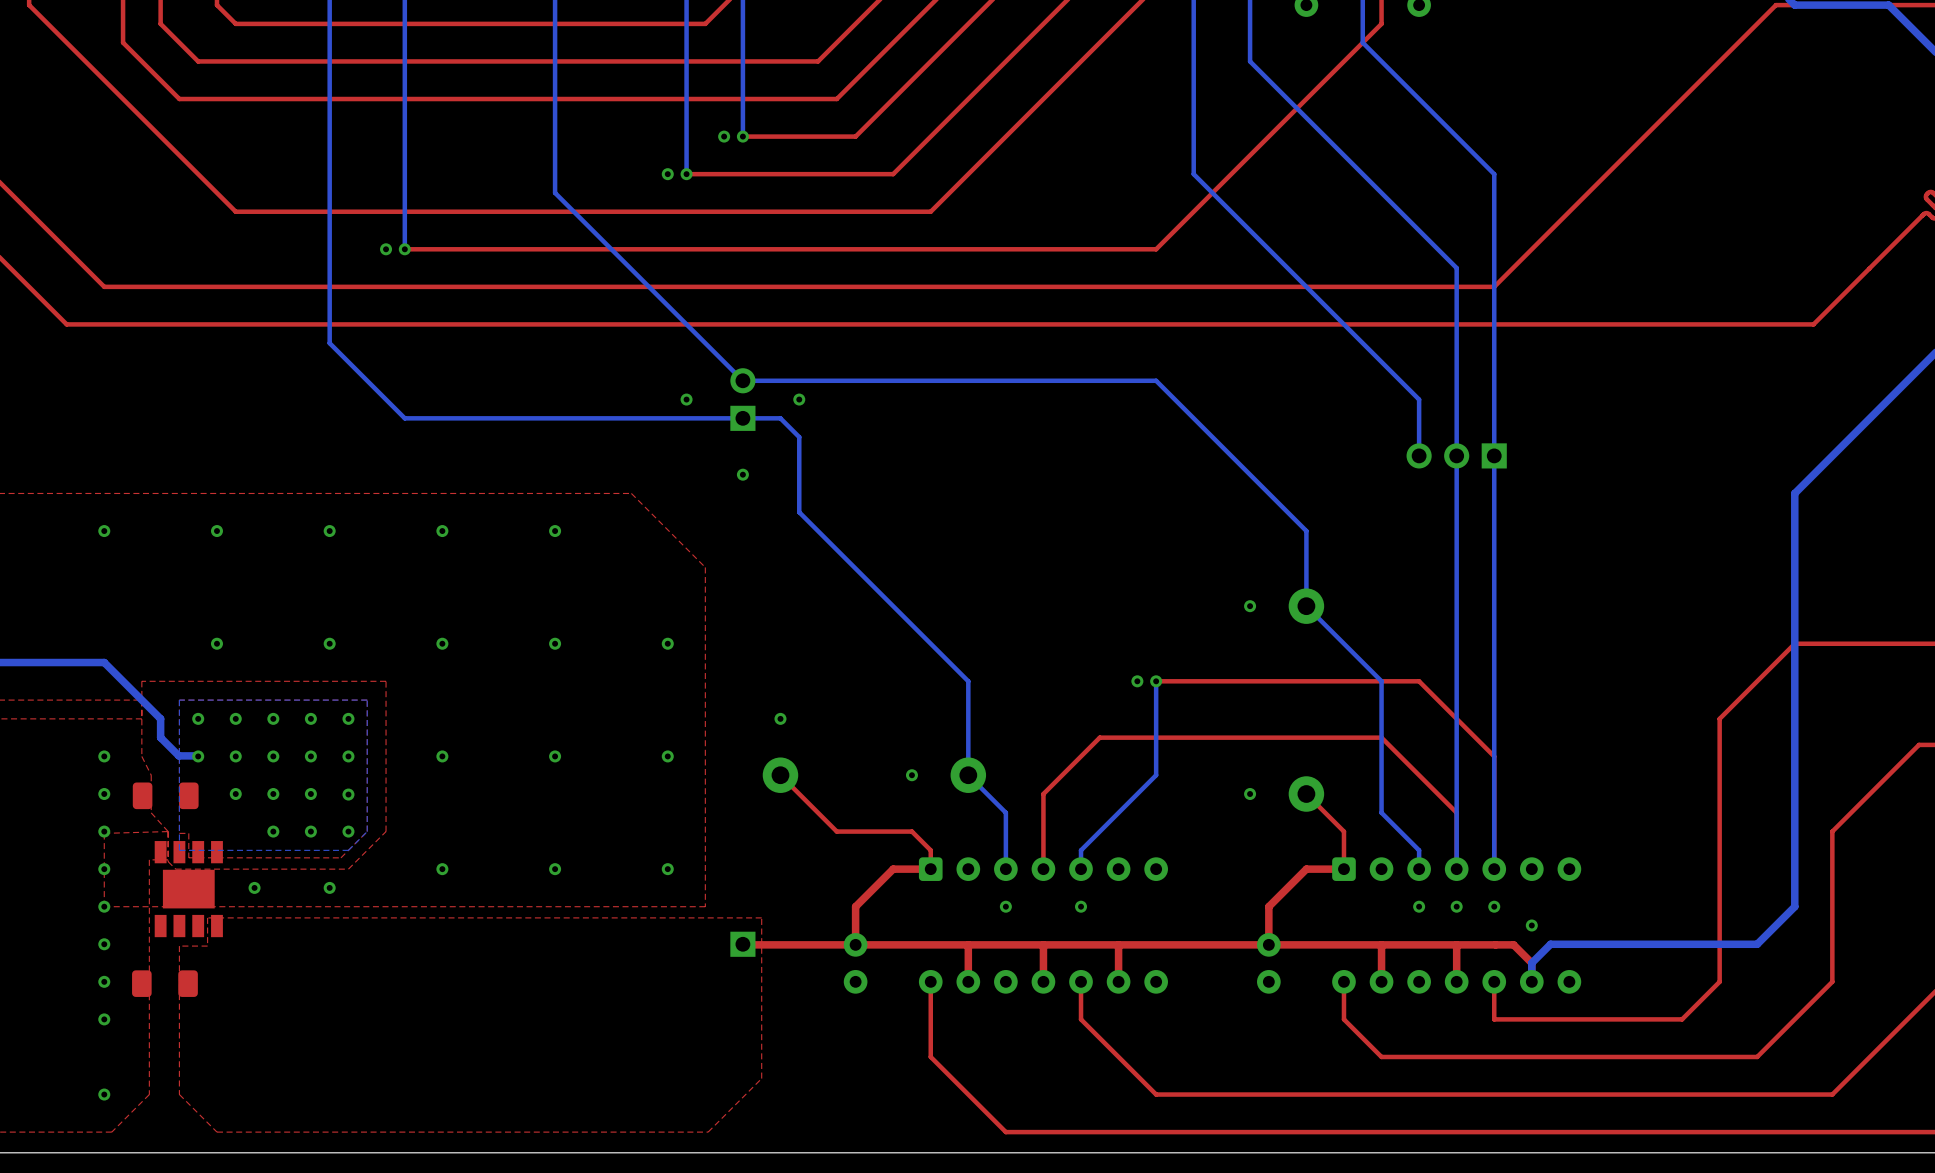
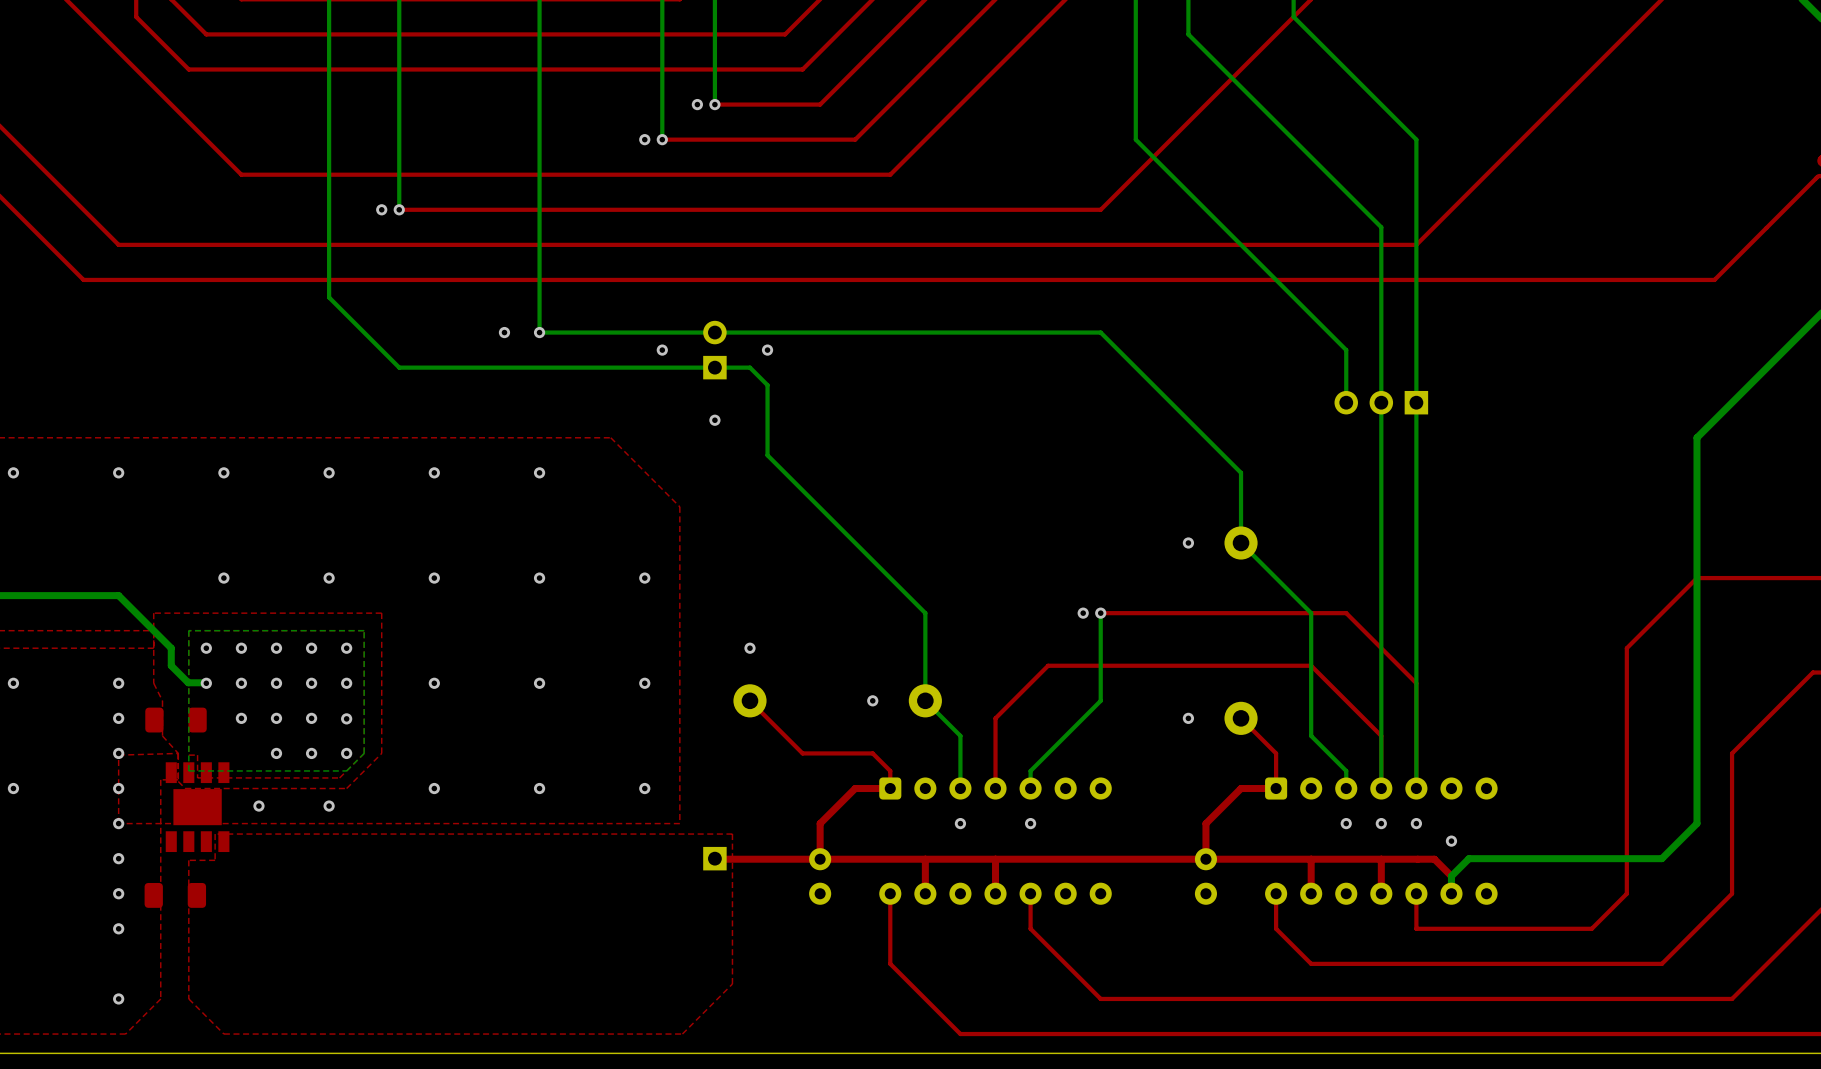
bottom track: (555, 192) (742, 380) -> (539, 157) (539, 332) (714, 332)
via: none -> (504, 332)
via: none -> (539, 332)
top track: (1118, 944) (1118, 981) -> none

